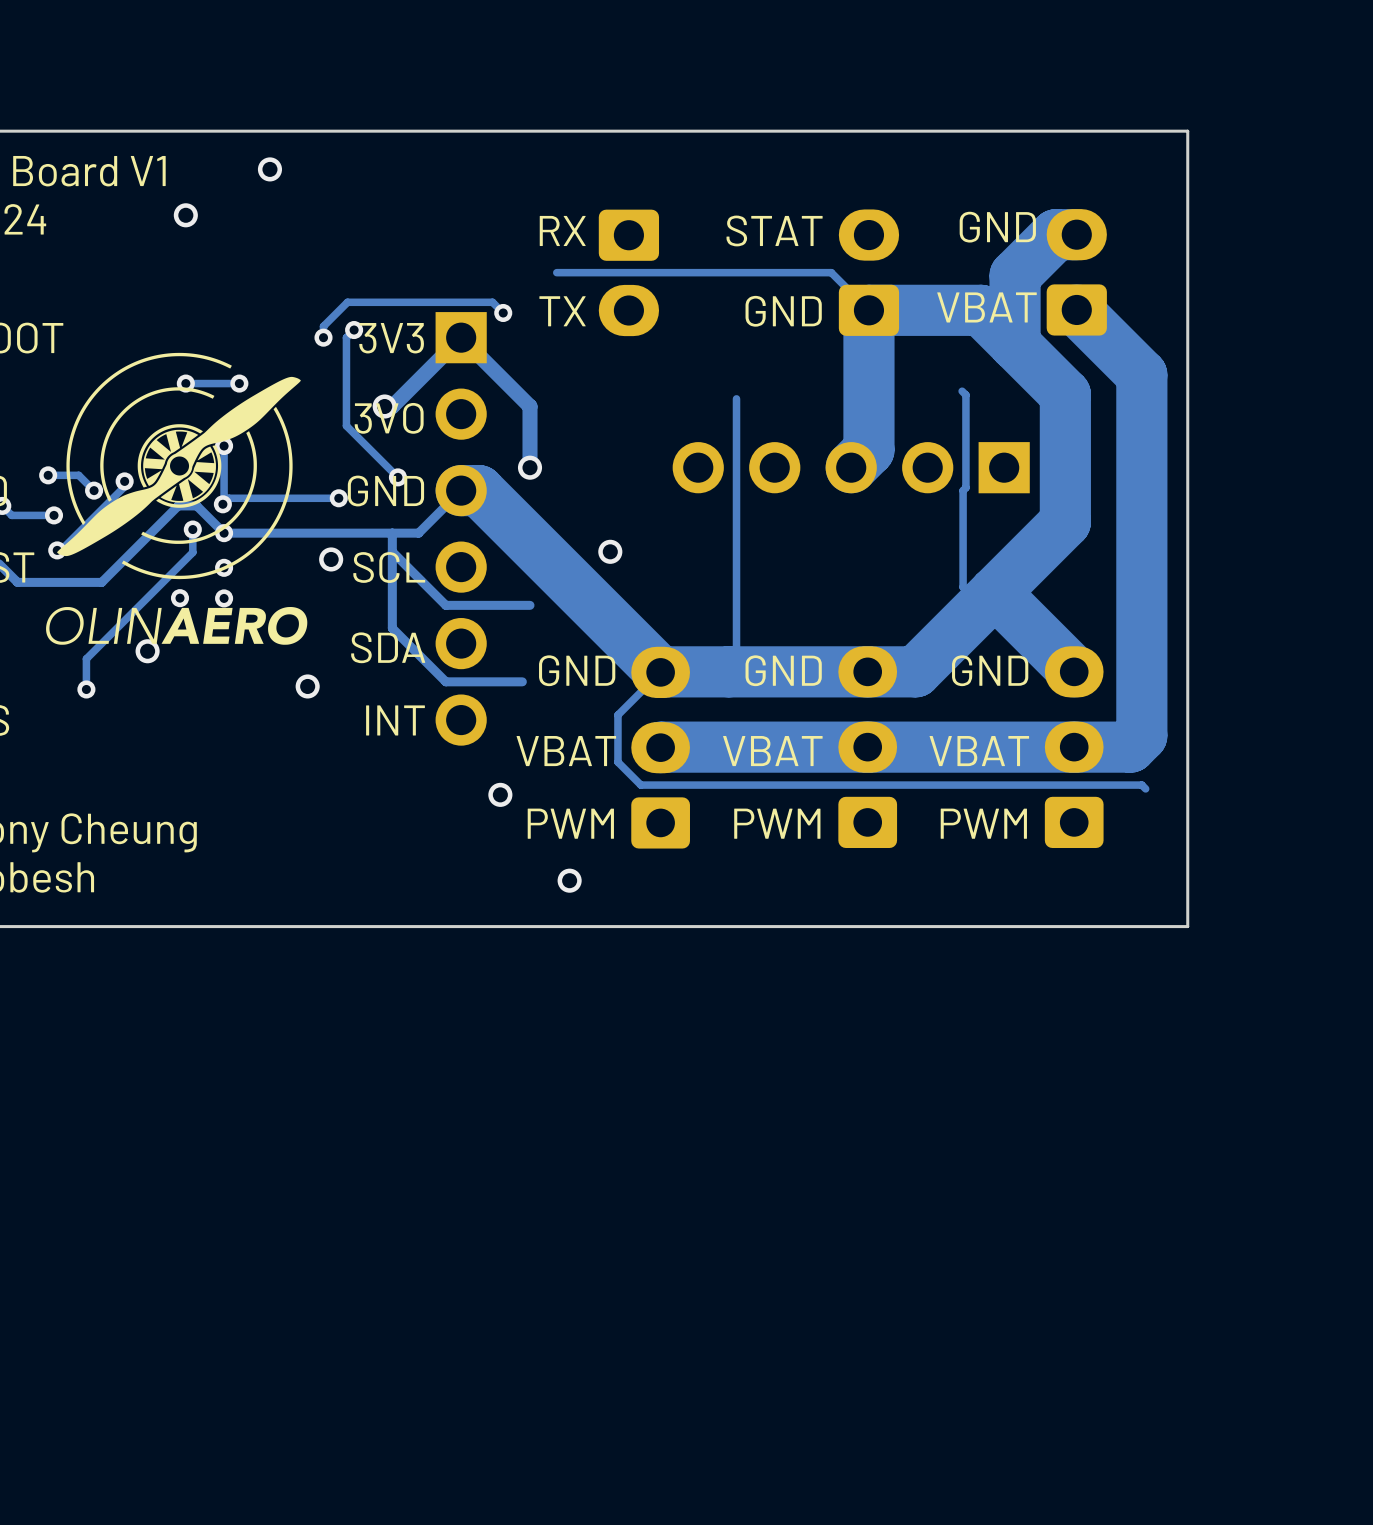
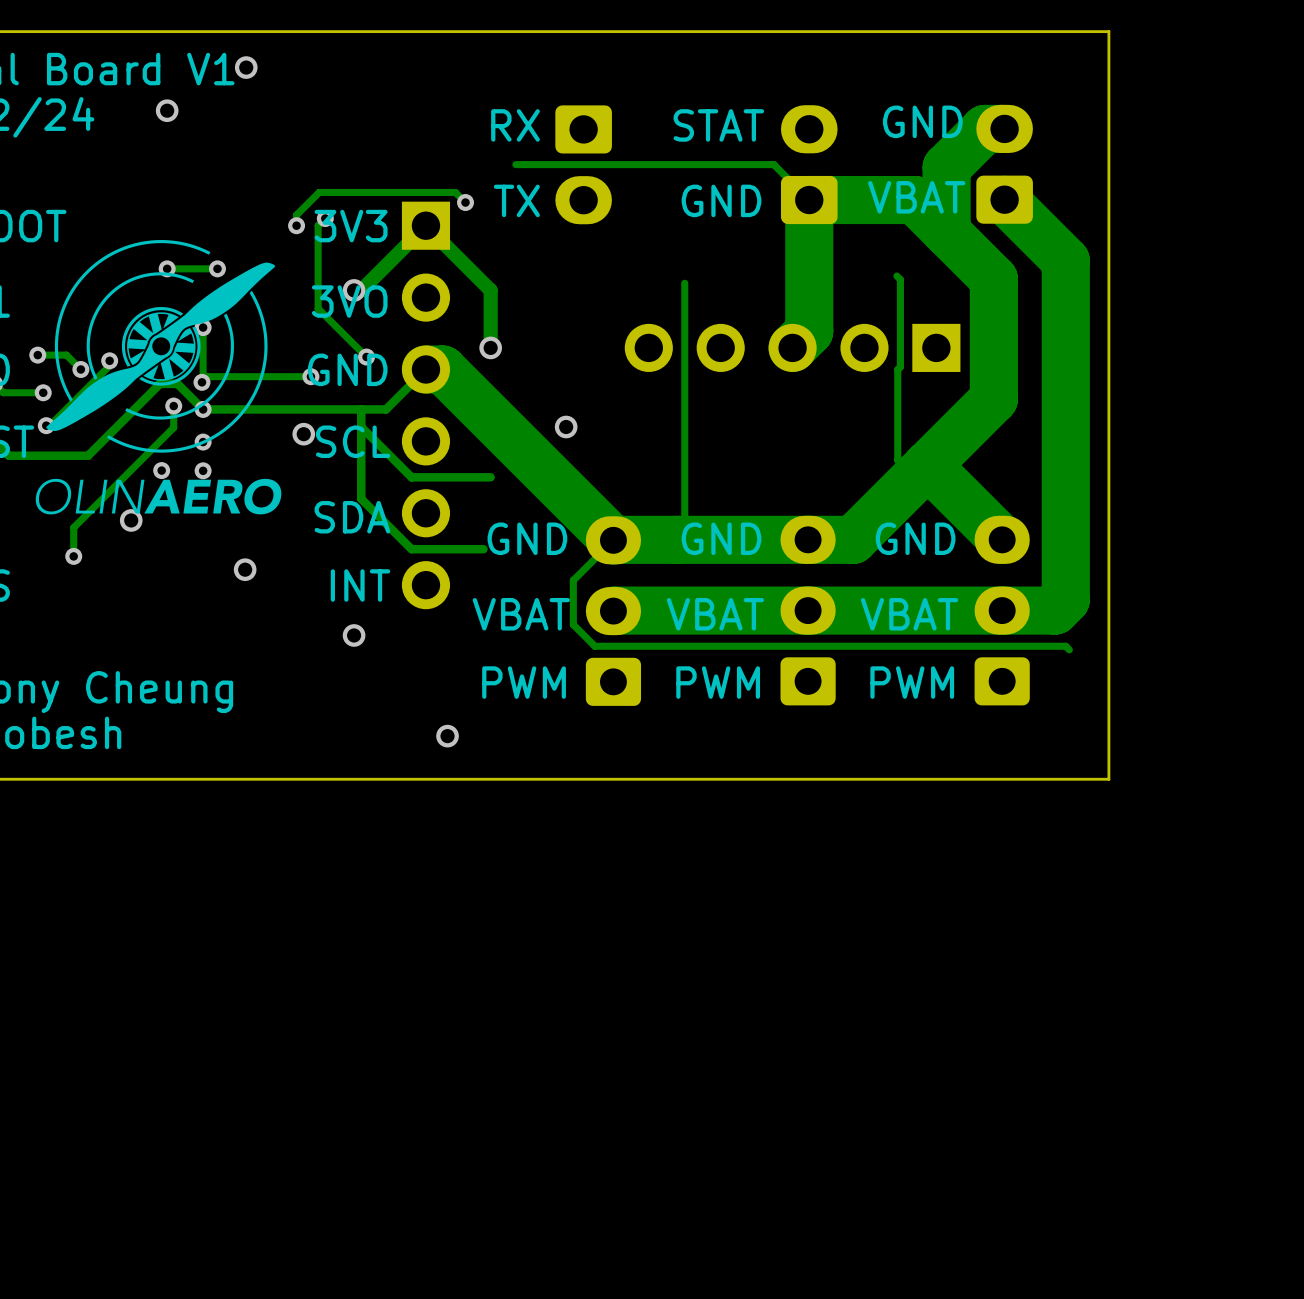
via position: (307, 686) -> (245, 569)
via: none -> (354, 635)
via: (500, 794) -> none
via: none -> (447, 736)
via: (569, 880) -> none

